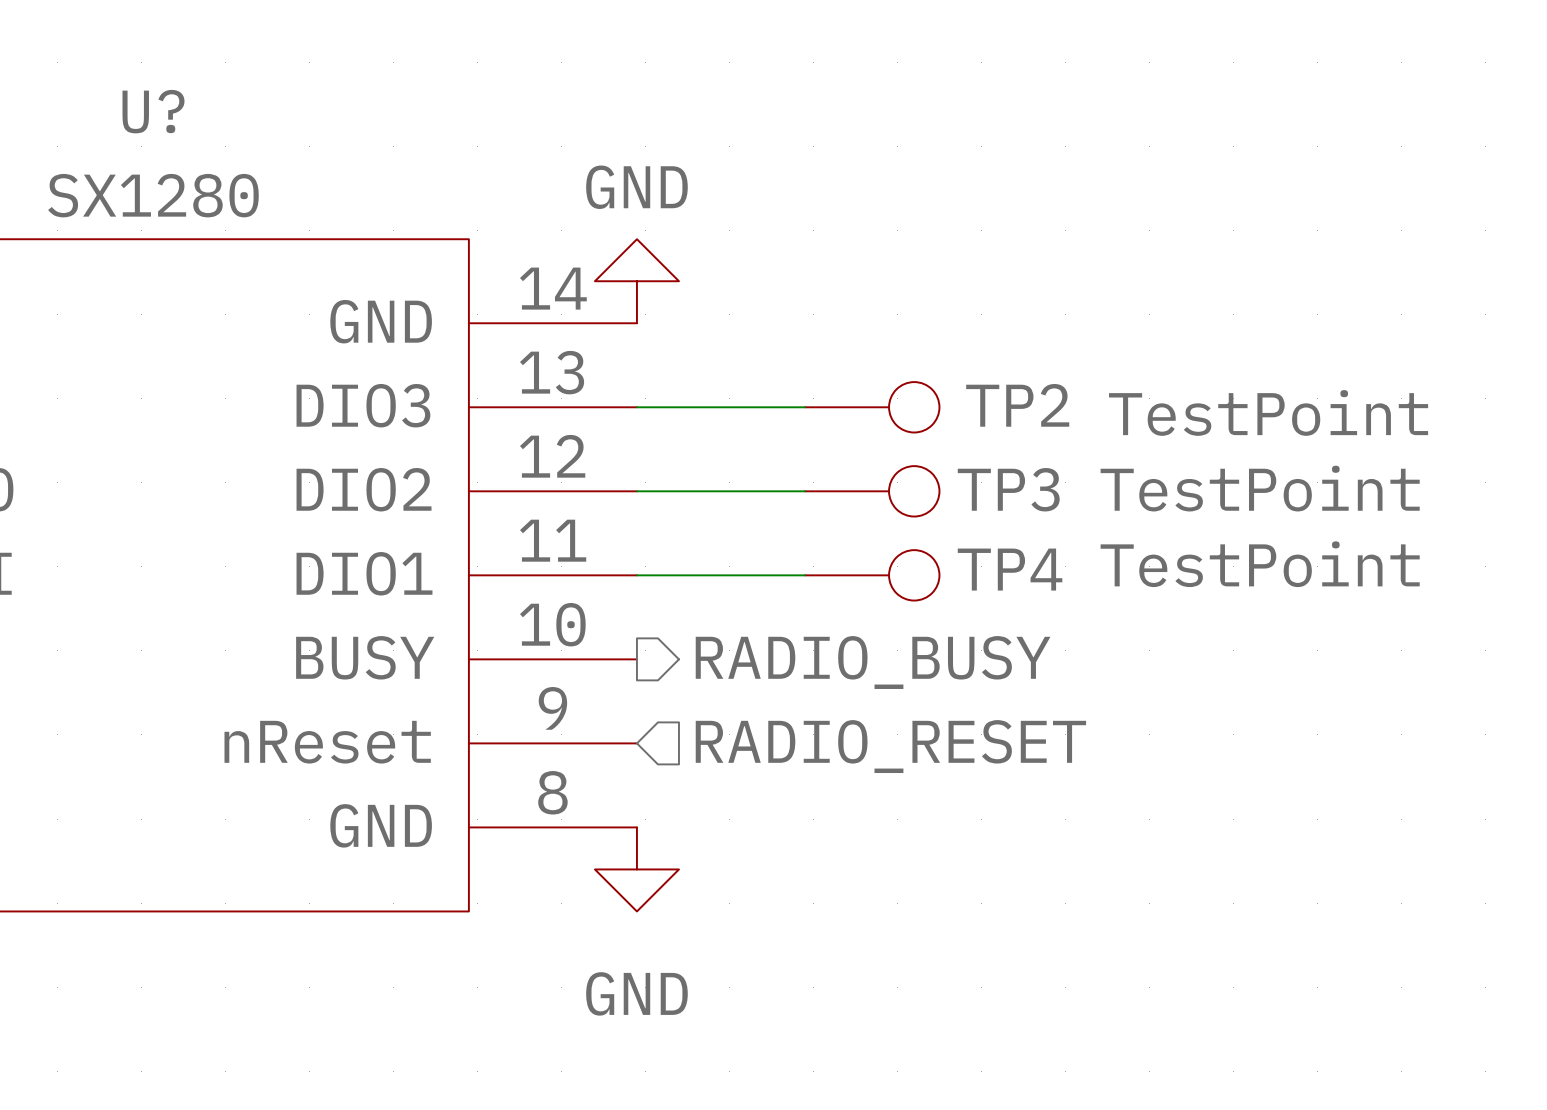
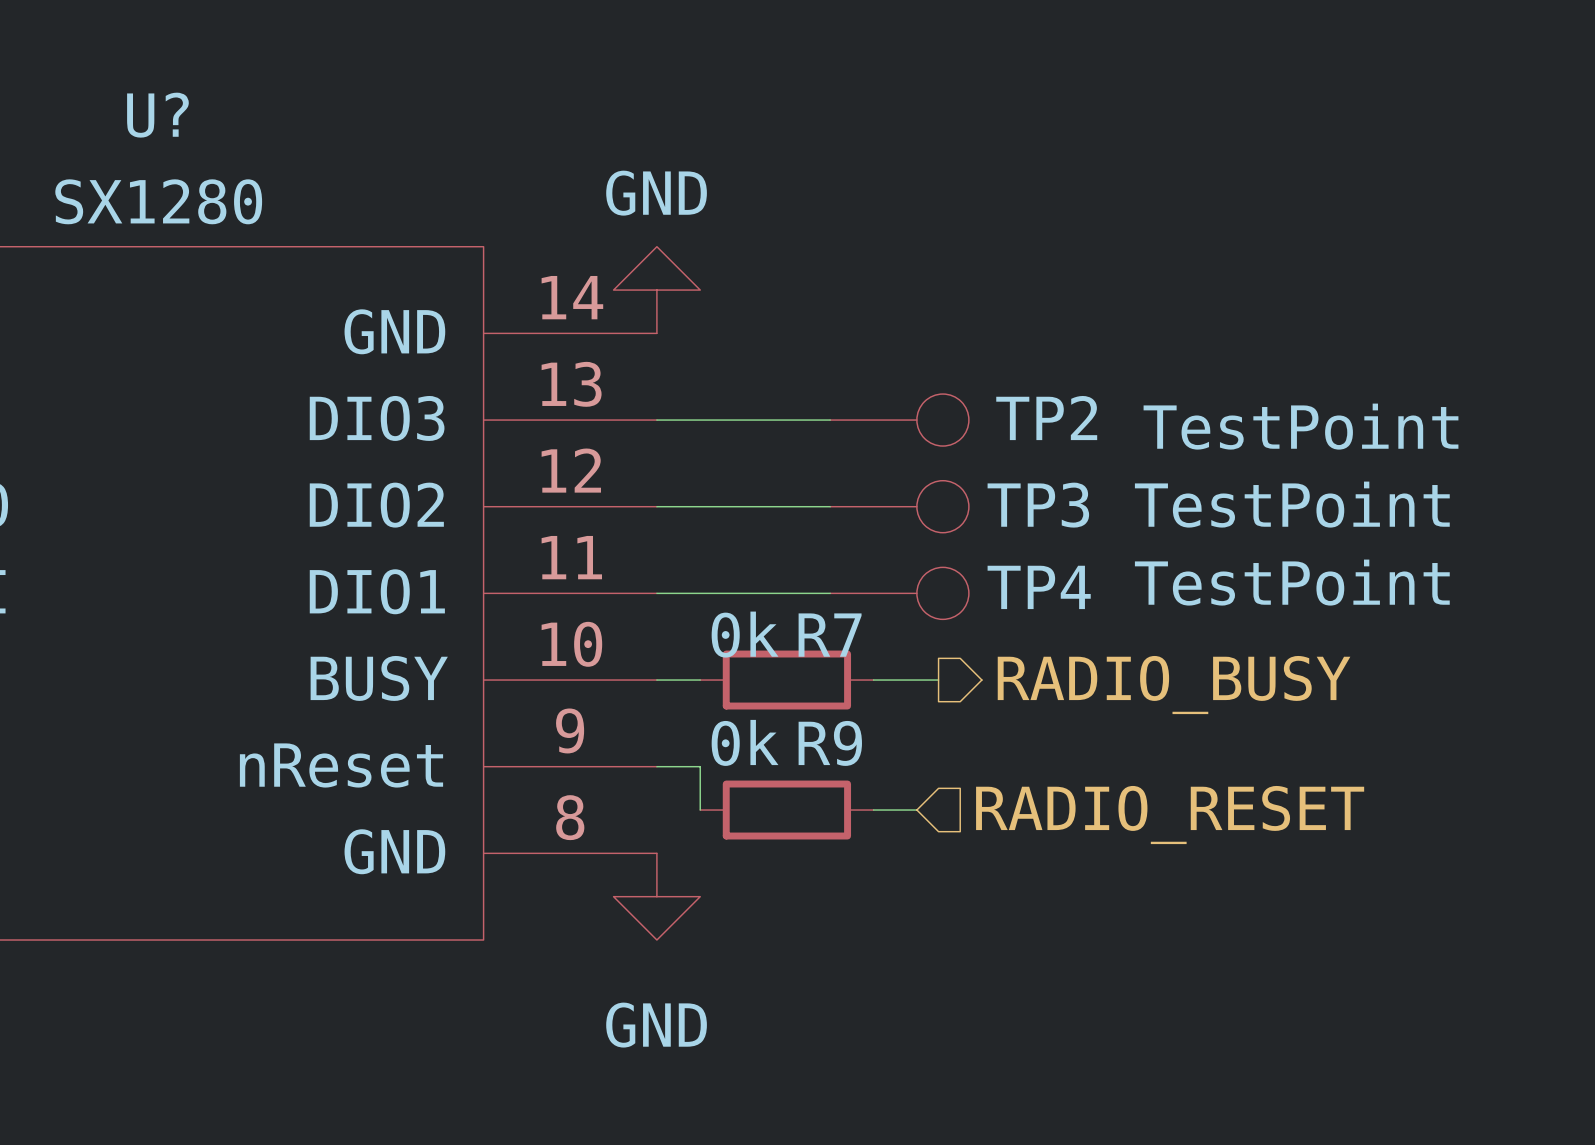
wire: none -> (656, 680) (700, 680)
R7: none -> 0k (786, 680)
wire: none -> (873, 680) (938, 680)
hierarchical label position: RADIO_BUSY (873, 662) -> RADIO_BUSY (1174, 685)
wire: none -> (656, 766) (700, 766) (700, 810)
hierarchical label position: RADIO_RESET (890, 746) -> RADIO_RESET (1170, 815)
R9: none -> 0k (786, 810)
wire: none -> (873, 810) (916, 810)

